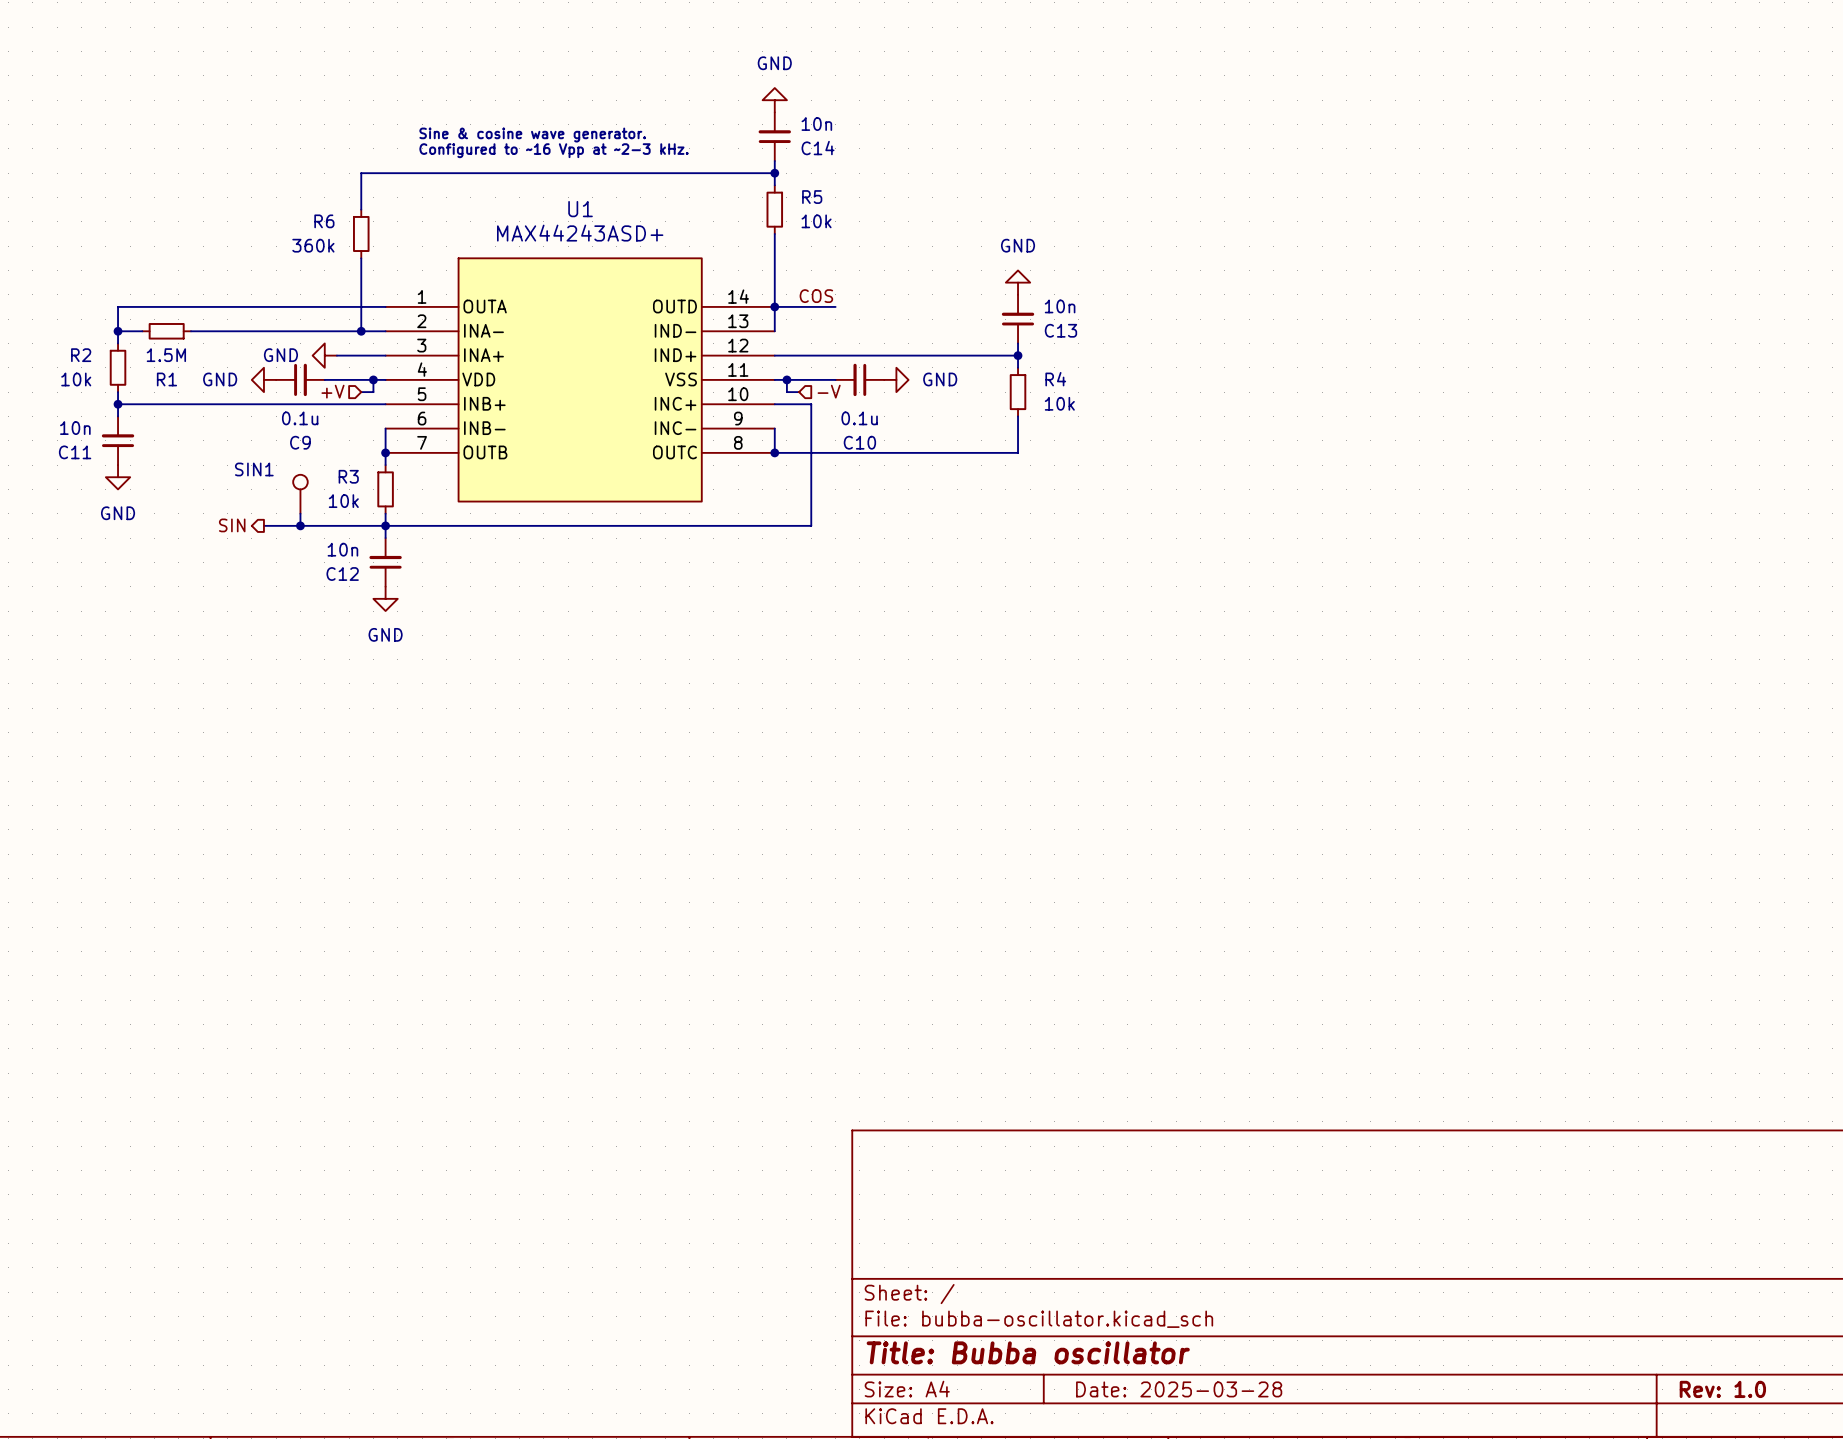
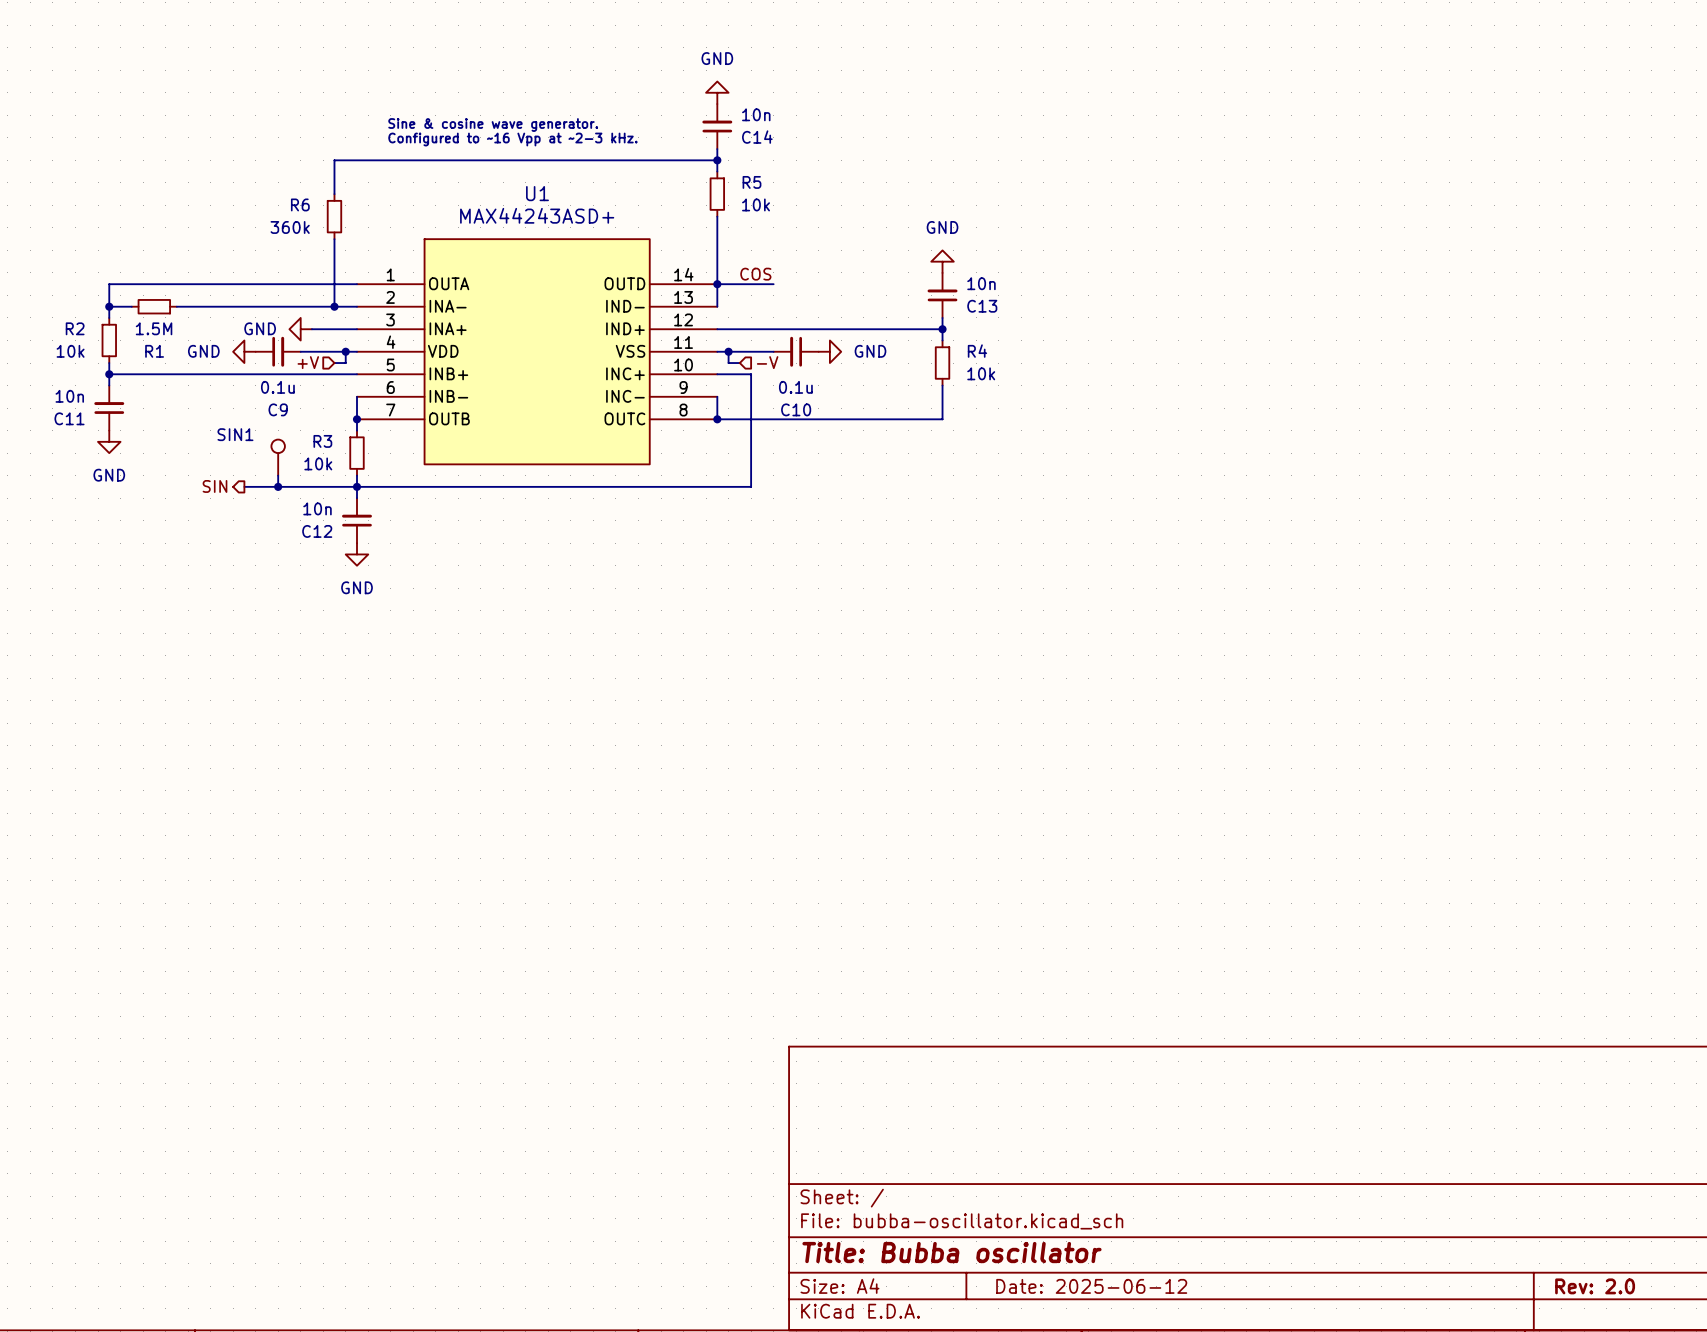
title block: Date: 2025-03-28 (1179, 1389) -> Date: 2025-06-12 (1091, 1286)
title block: Rev: 1.0 (1722, 1389) -> Rev: 2.0 (1595, 1286)

